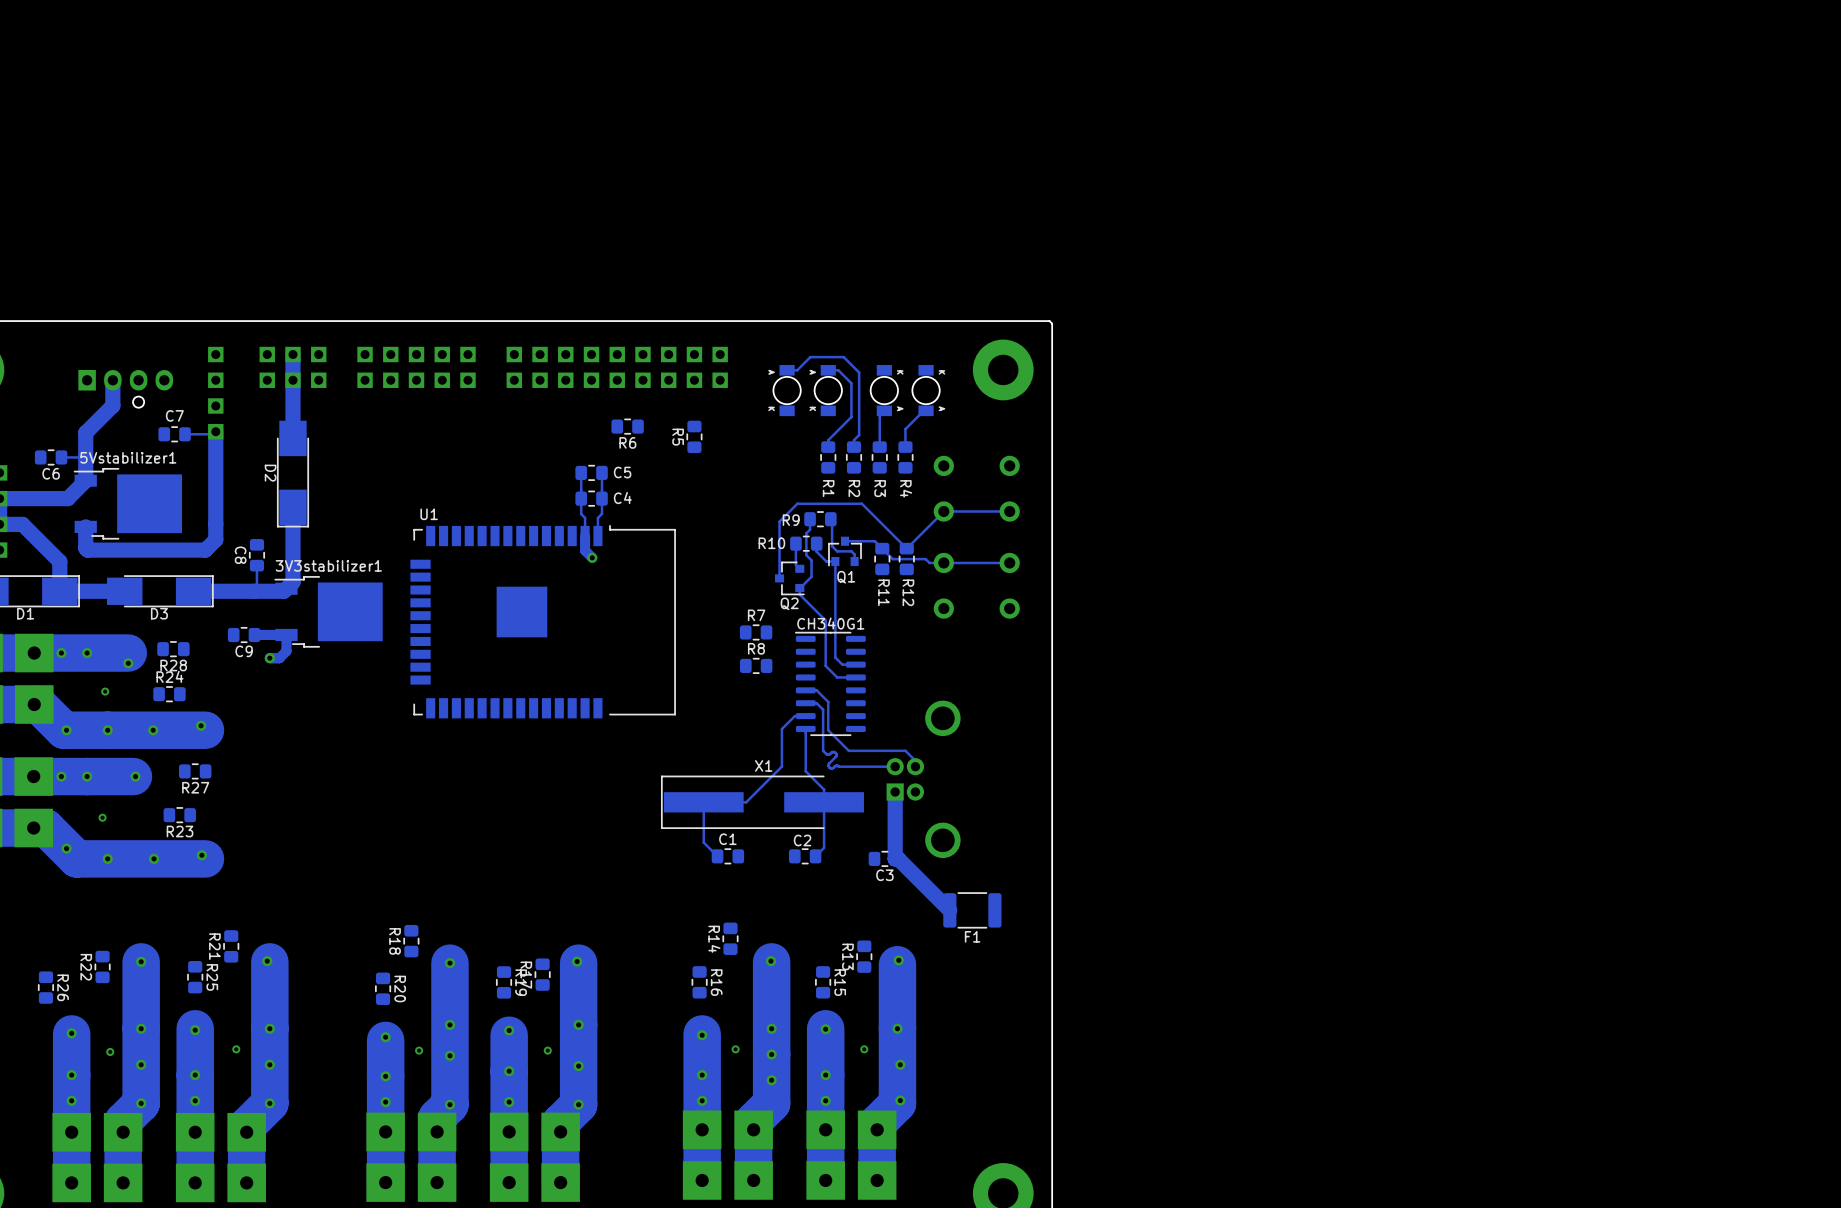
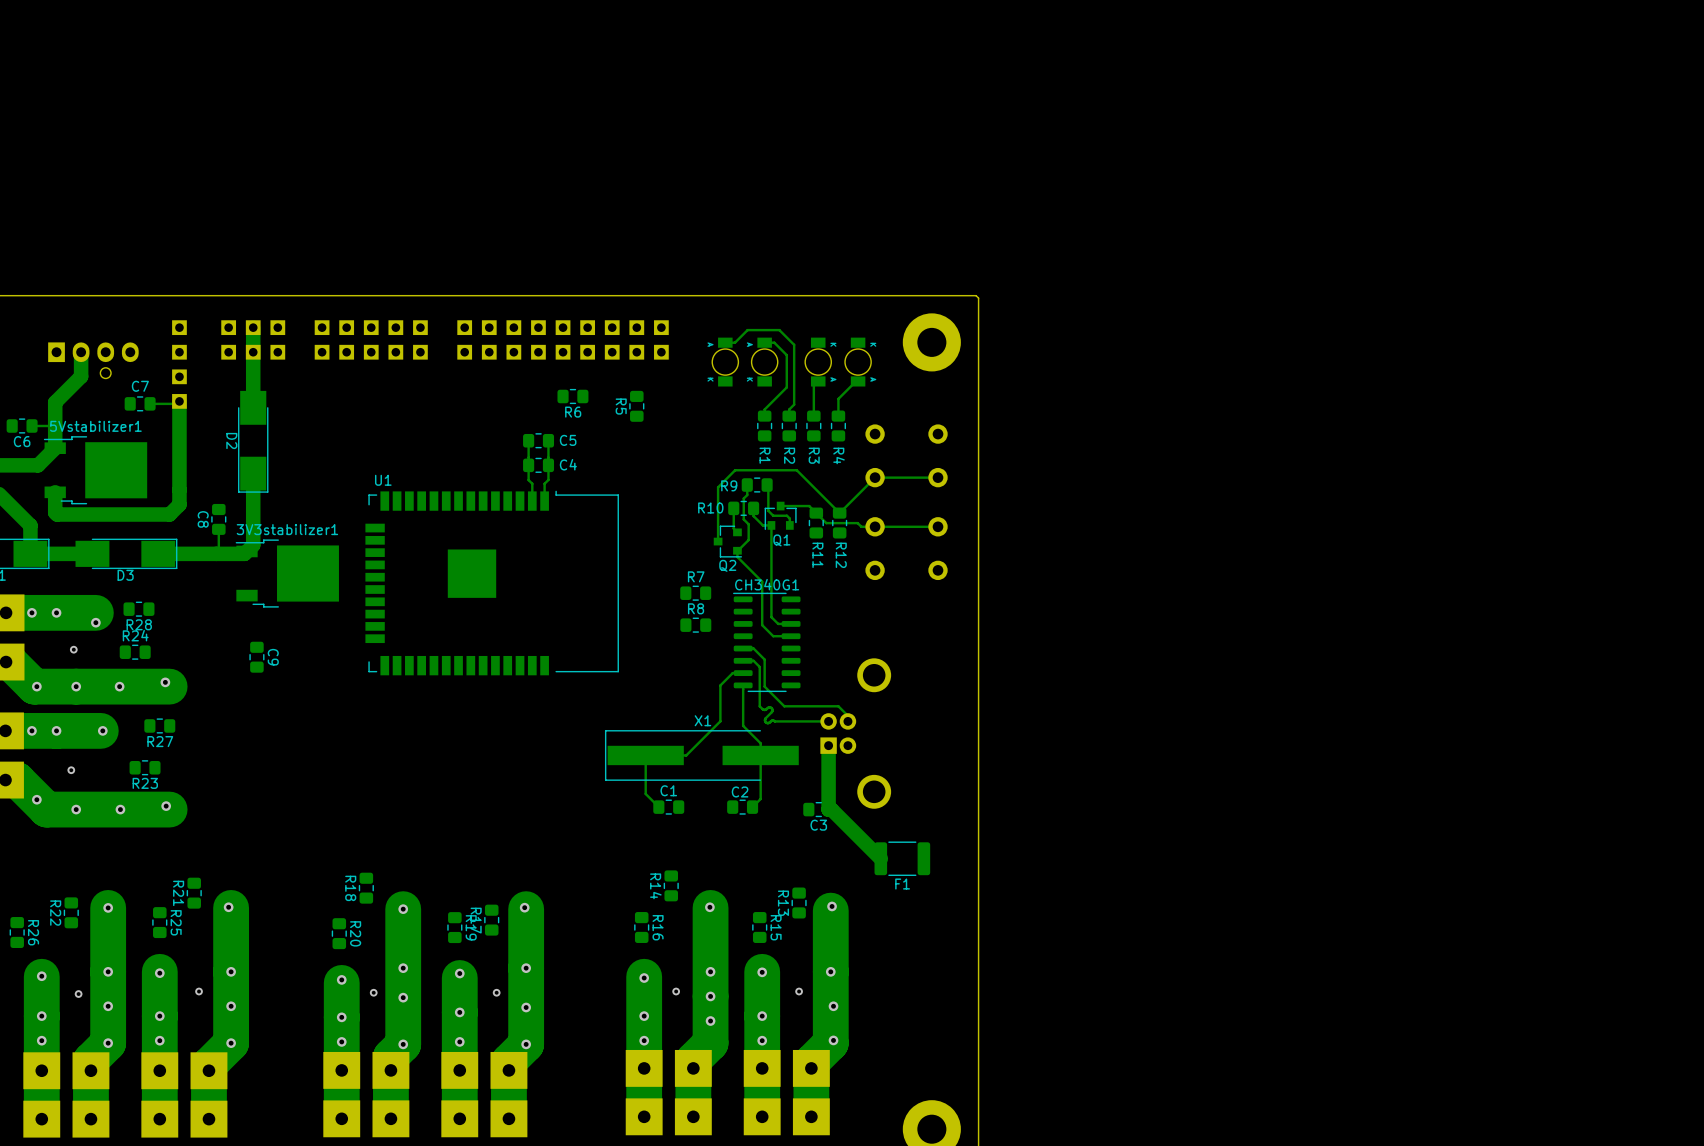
track: (585, 536) (585, 550) (592, 557) -> none
via: (592, 557) -> none
track: (254, 634) (286, 634) (286, 651) (279, 658) (269, 658) -> none
C9 rotation: 0° (244, 635) -> 90° clockwise (256, 657)
C9 position: (244, 635) -> (256, 657)
C9 name position: C9 (244, 651) -> C9 (273, 657)
via: (269, 658) -> none

